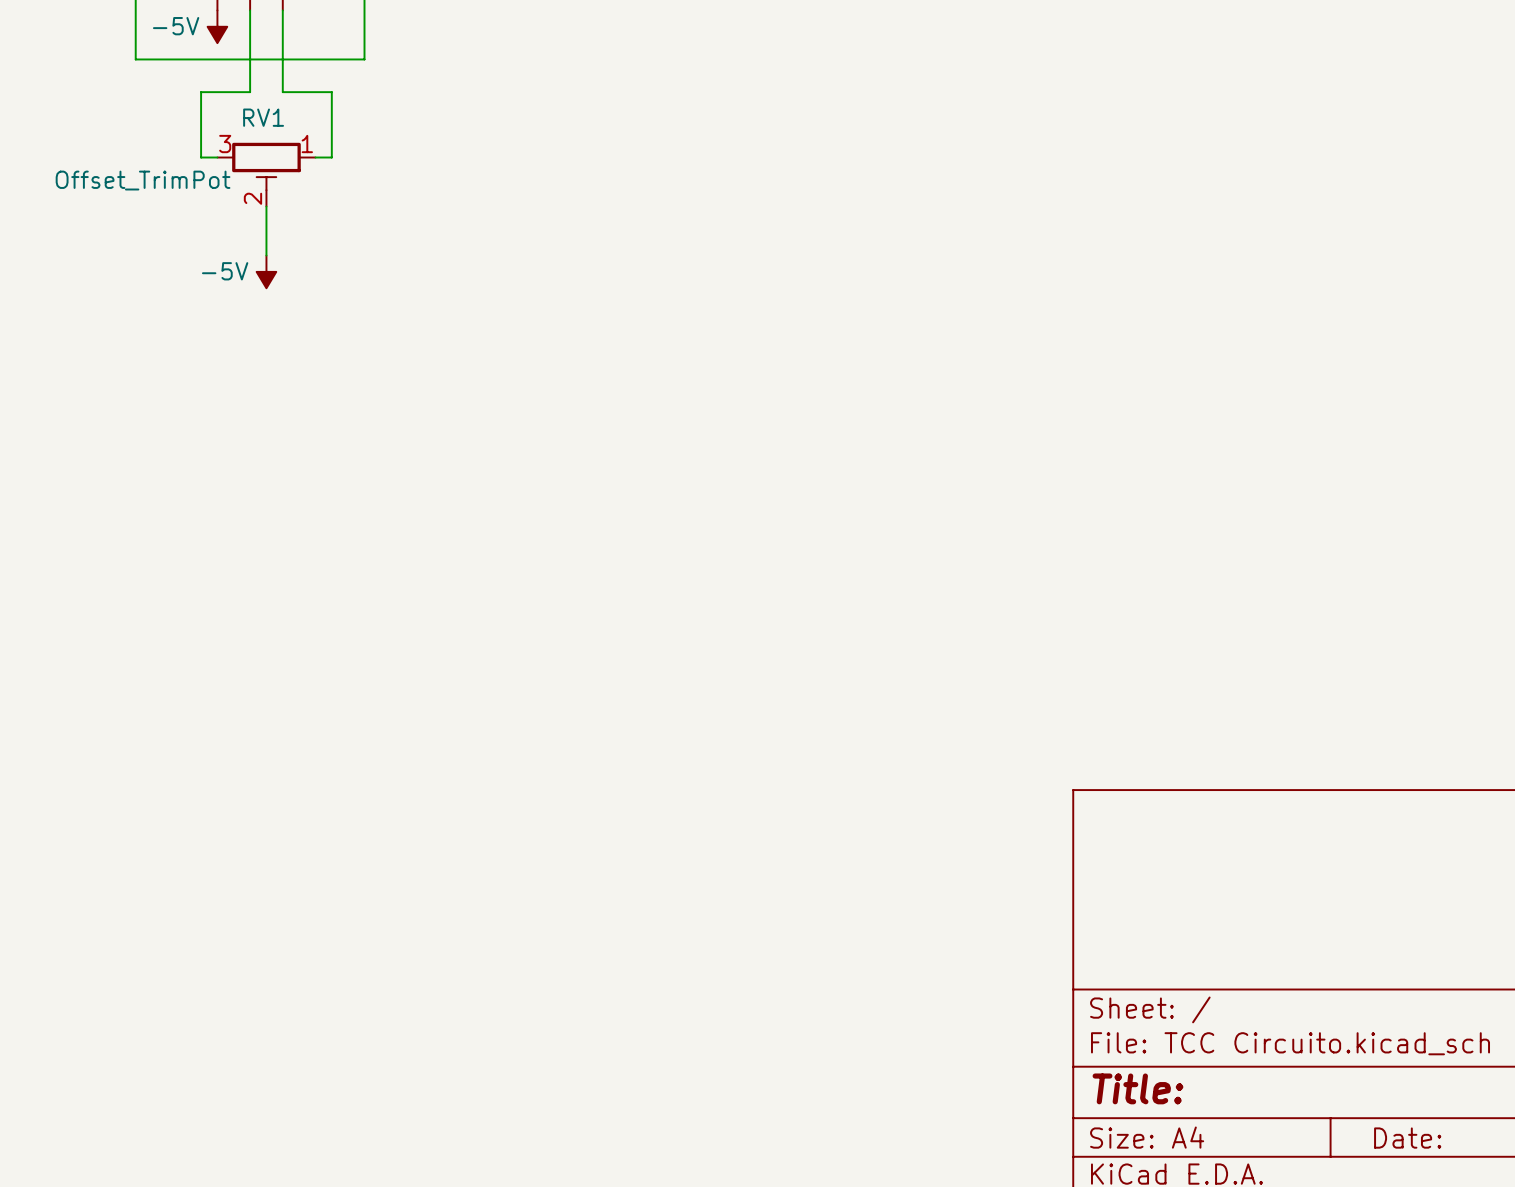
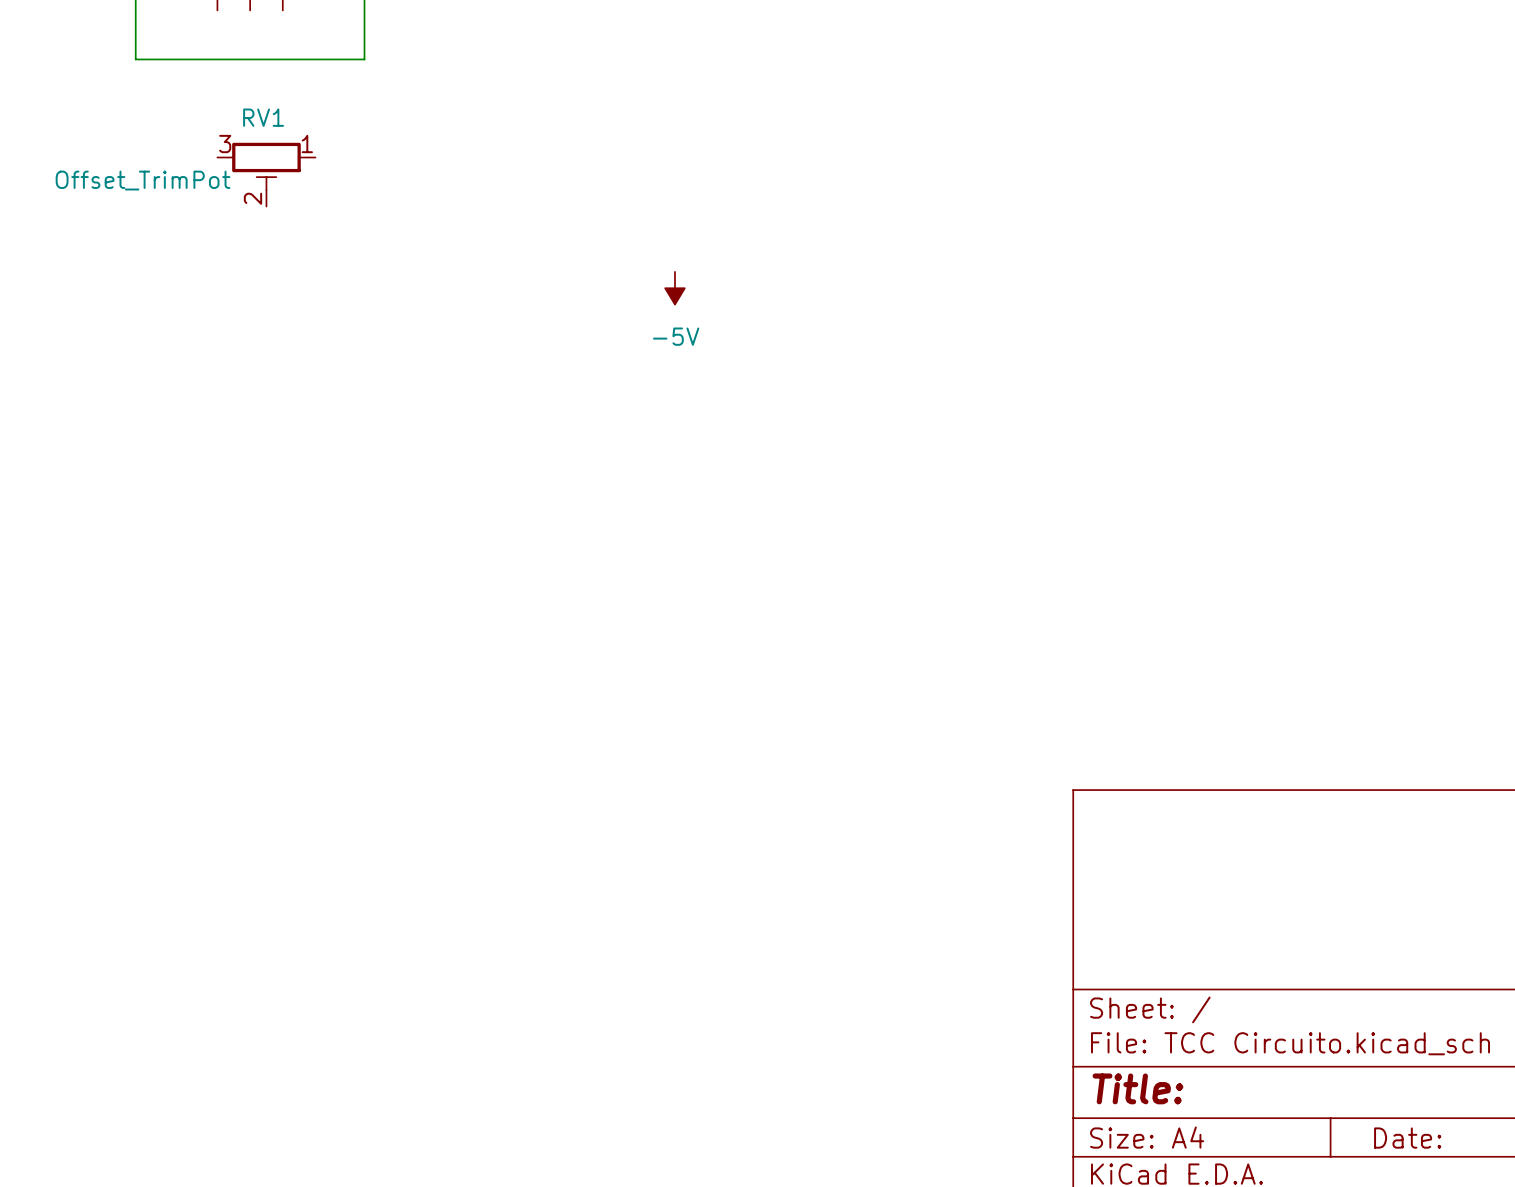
wire: (250, 10) (250, 92) (201, 92) (201, 157) (217, 157) -> none
wire: (282, 10) (282, 92) (331, 92) (331, 157) (315, 157) -> none
power symbol: -5V (217, 26) -> none
wire: (266, 206) (266, 255) -> none
power symbol: -5V (266, 271) -> none
power symbol: none -> -5V (674, 288)

